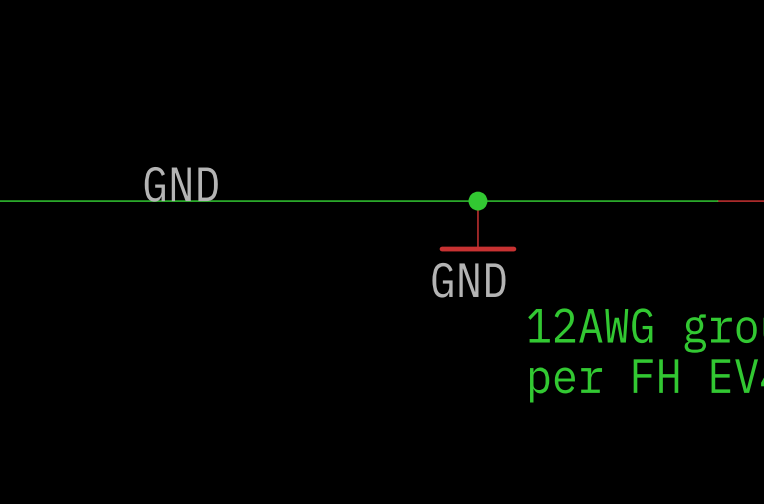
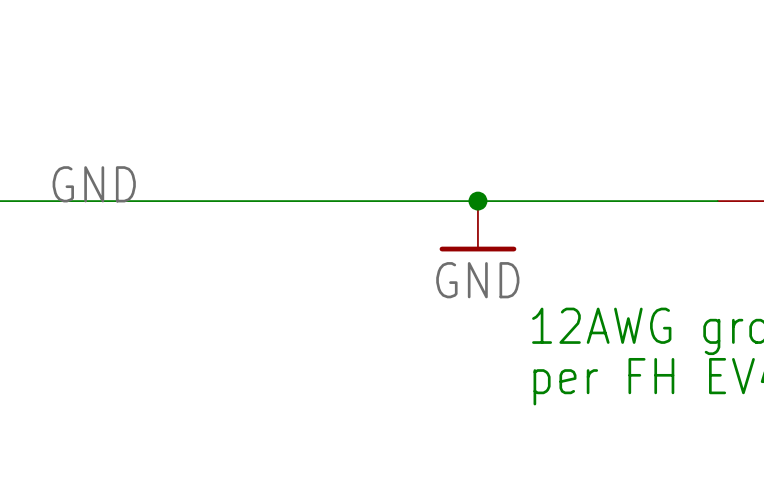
label position: GND (181, 184) -> GND (94, 184)

